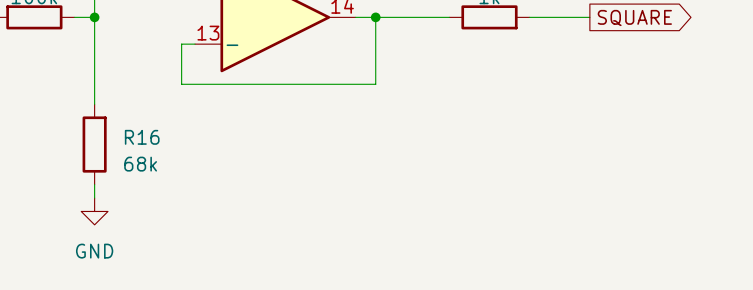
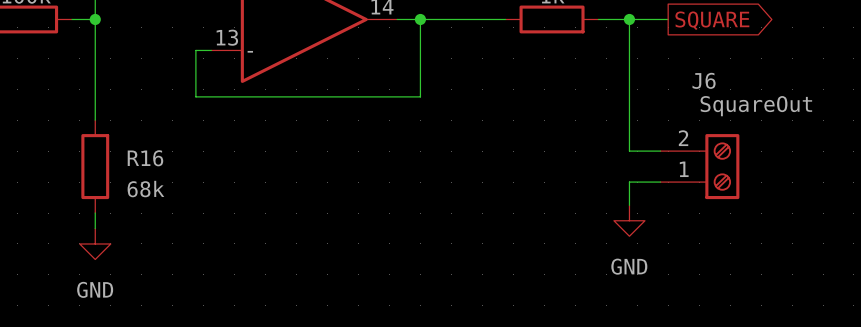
wire: none -> (629, 19) (629, 151) (660, 151)
junction: none -> (629, 19)
J6: none -> SquareOut (699, 166)
wire: none -> (660, 182) (629, 182) (629, 205)
power symbol: none -> GND (629, 220)

